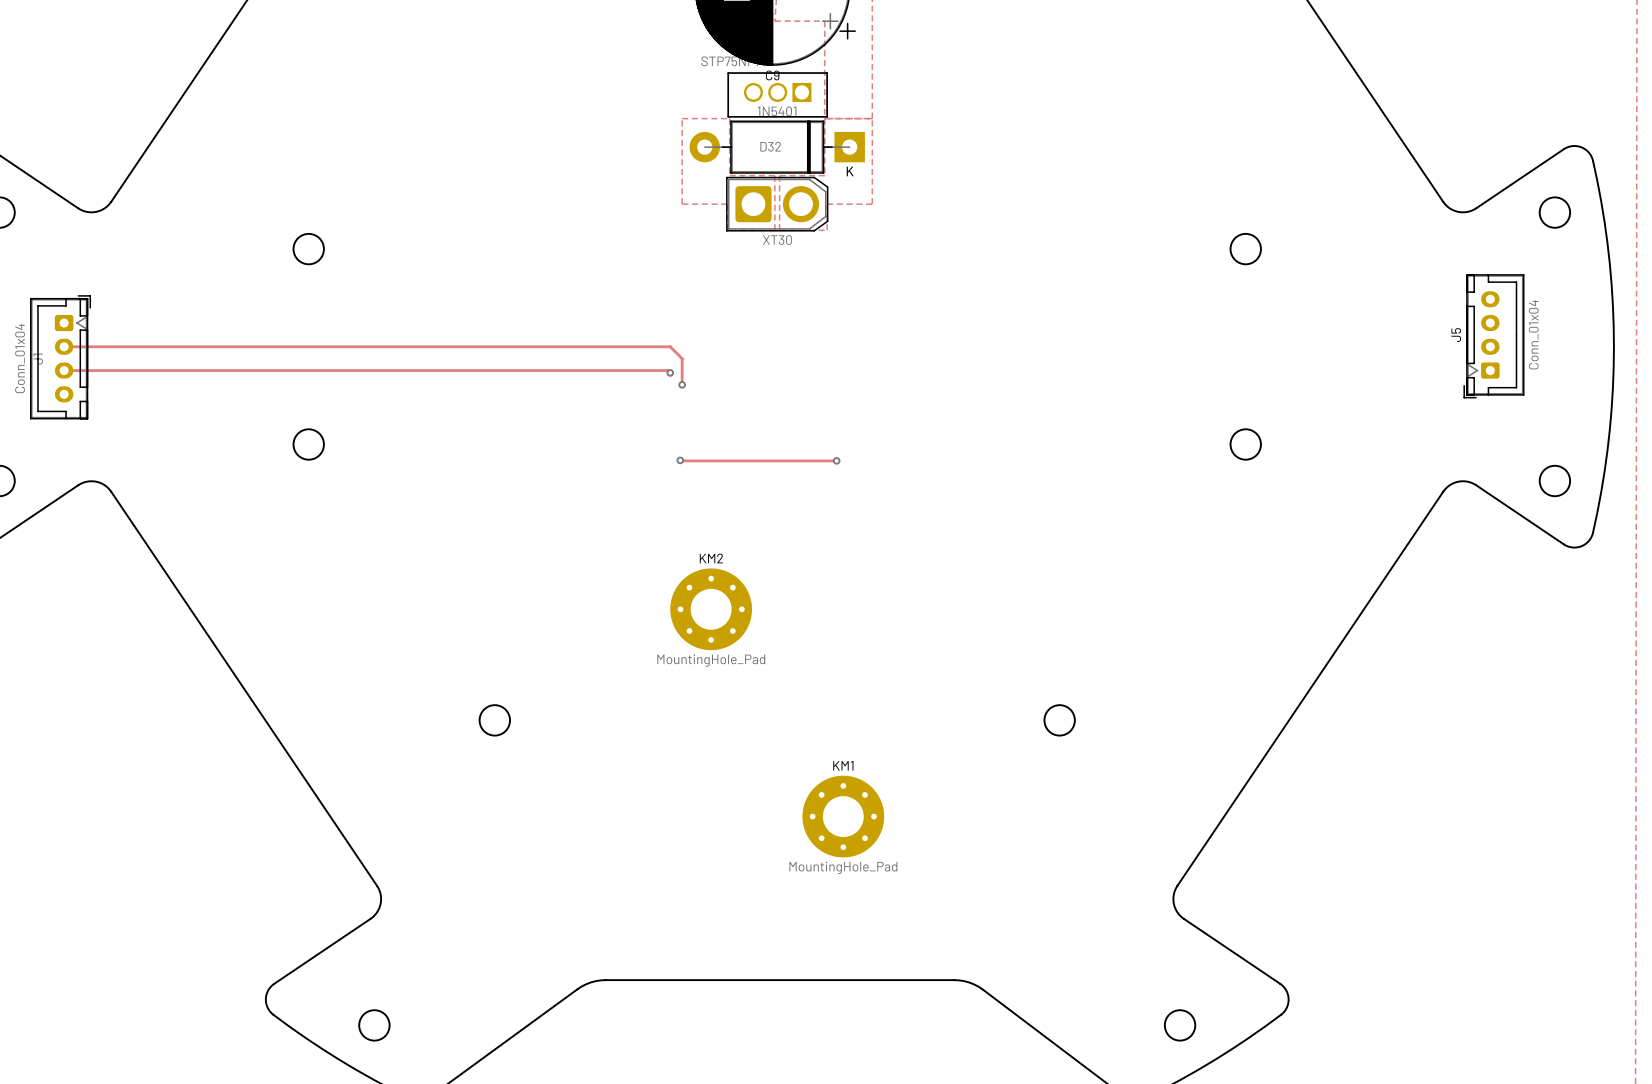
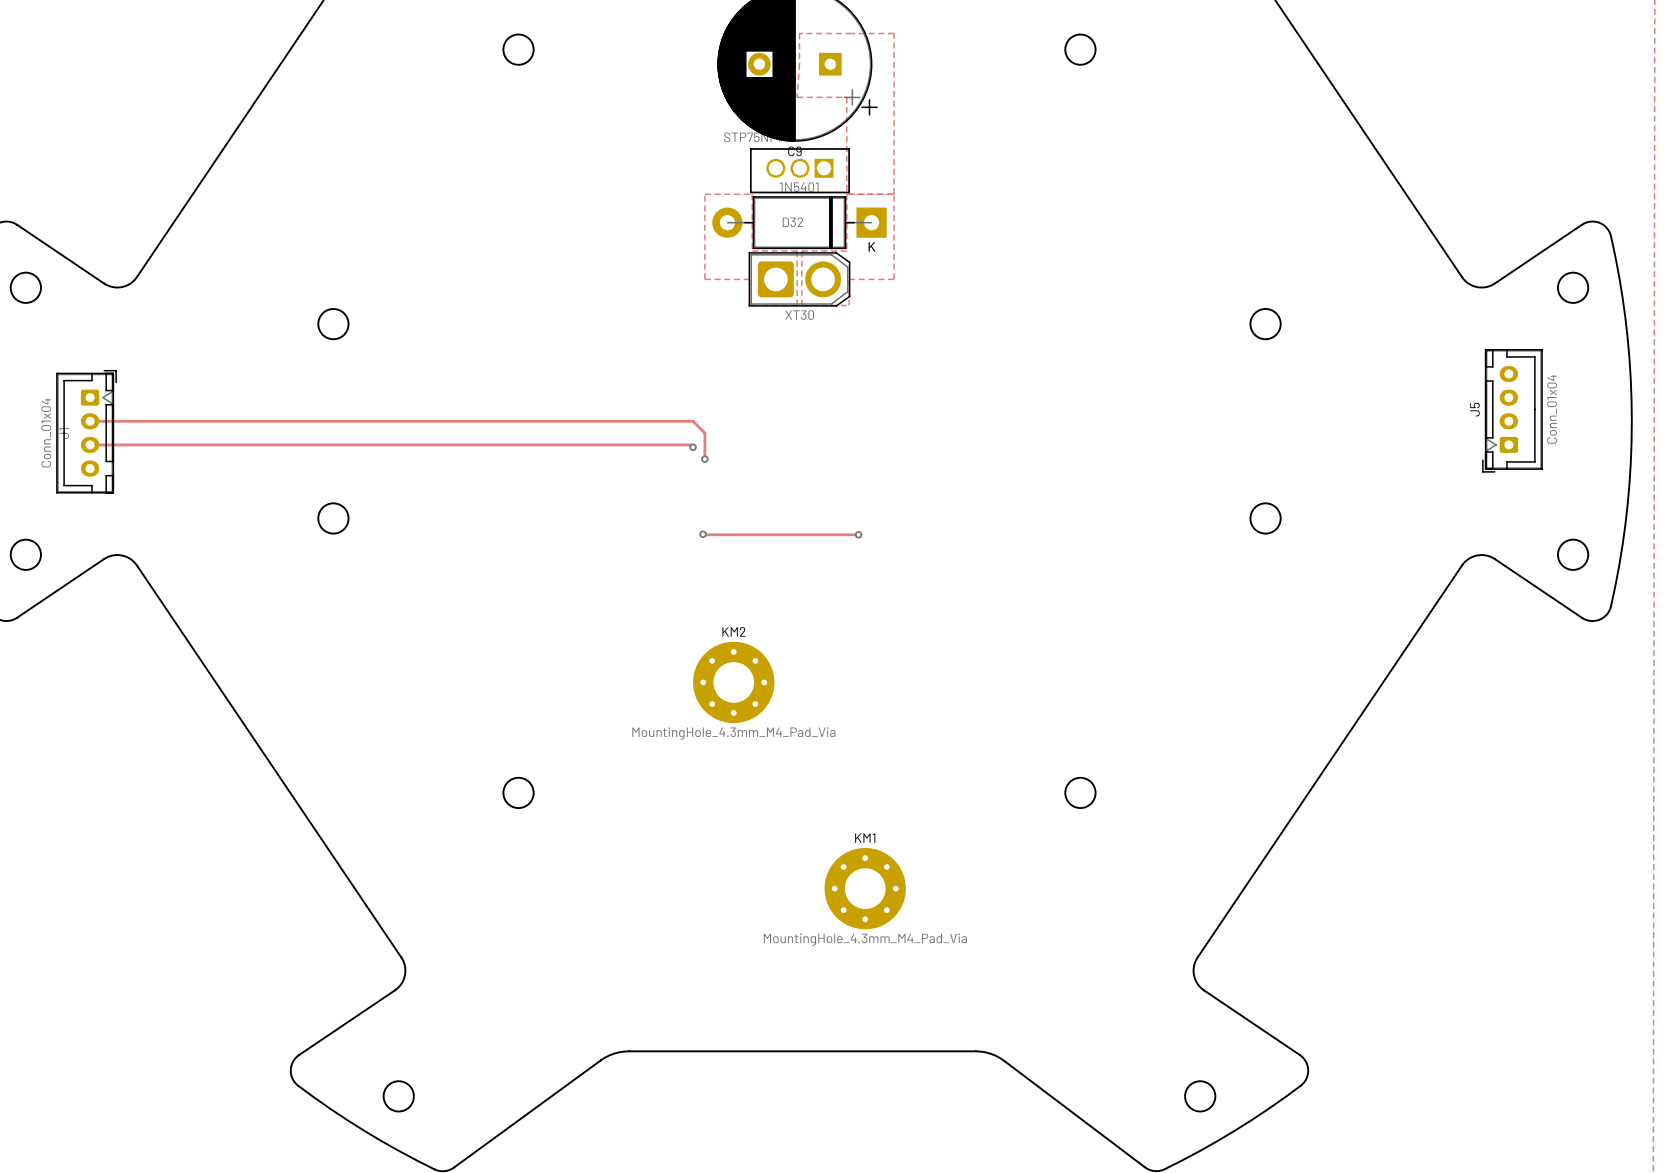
KM2 value: MountingHole_Pad (711, 660) -> MountingHole_4.3mm_M4_Pad_Via (733, 733)
KM1 value: MountingHole_Pad (843, 867) -> MountingHole_4.3mm_M4_Pad_Via (865, 939)

